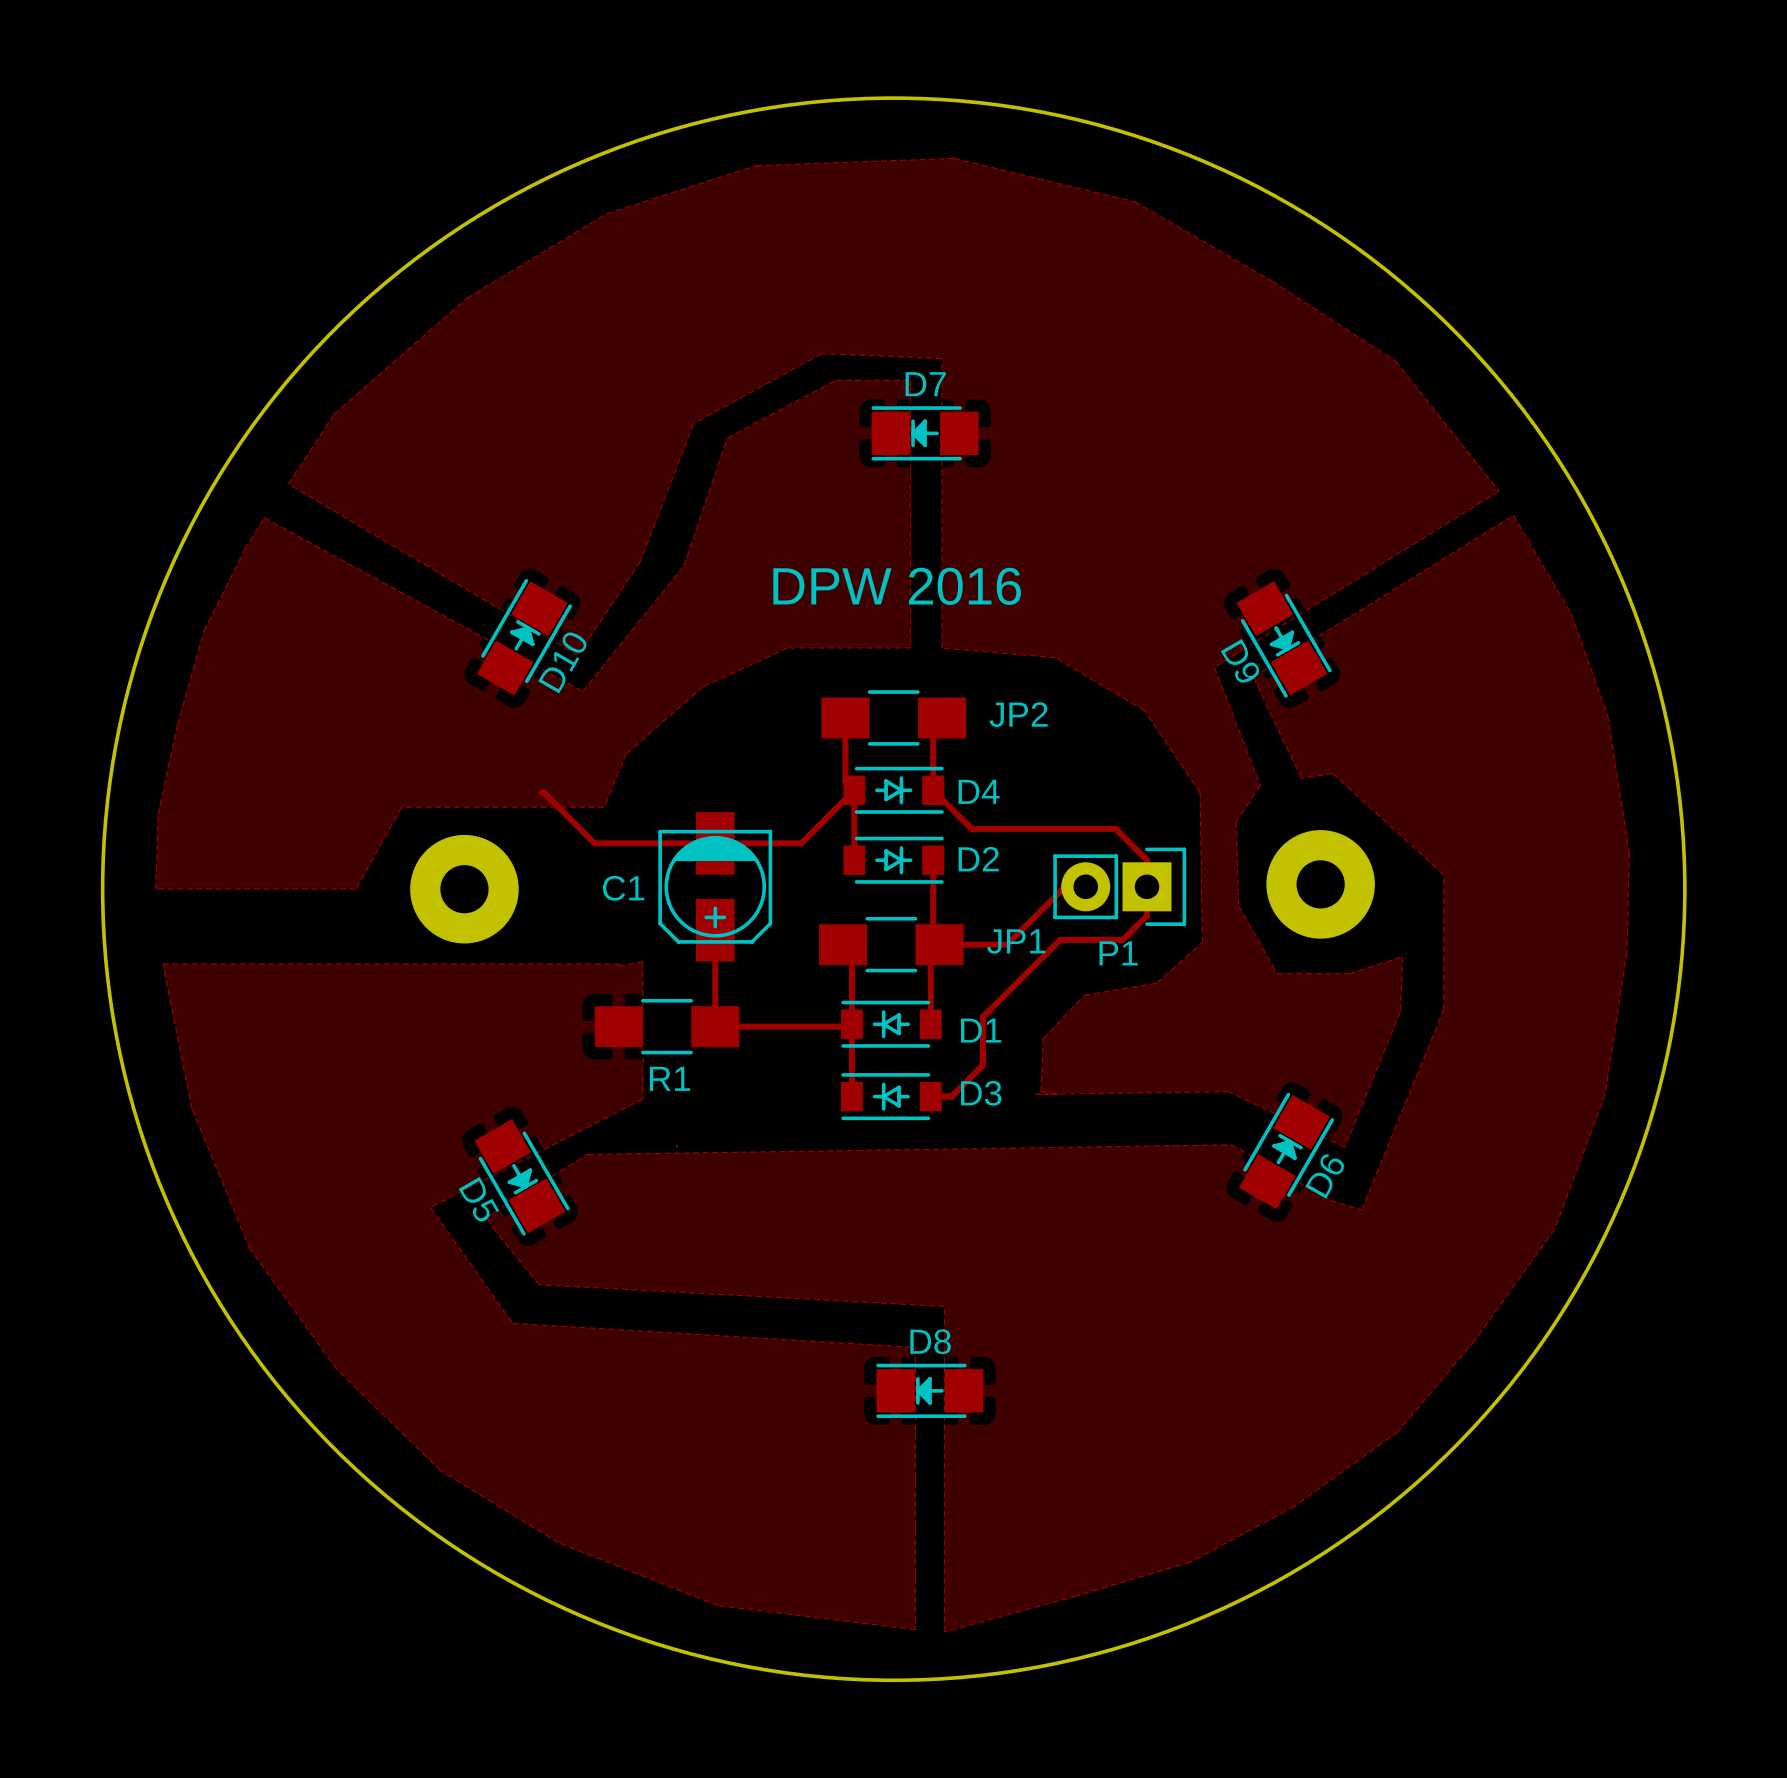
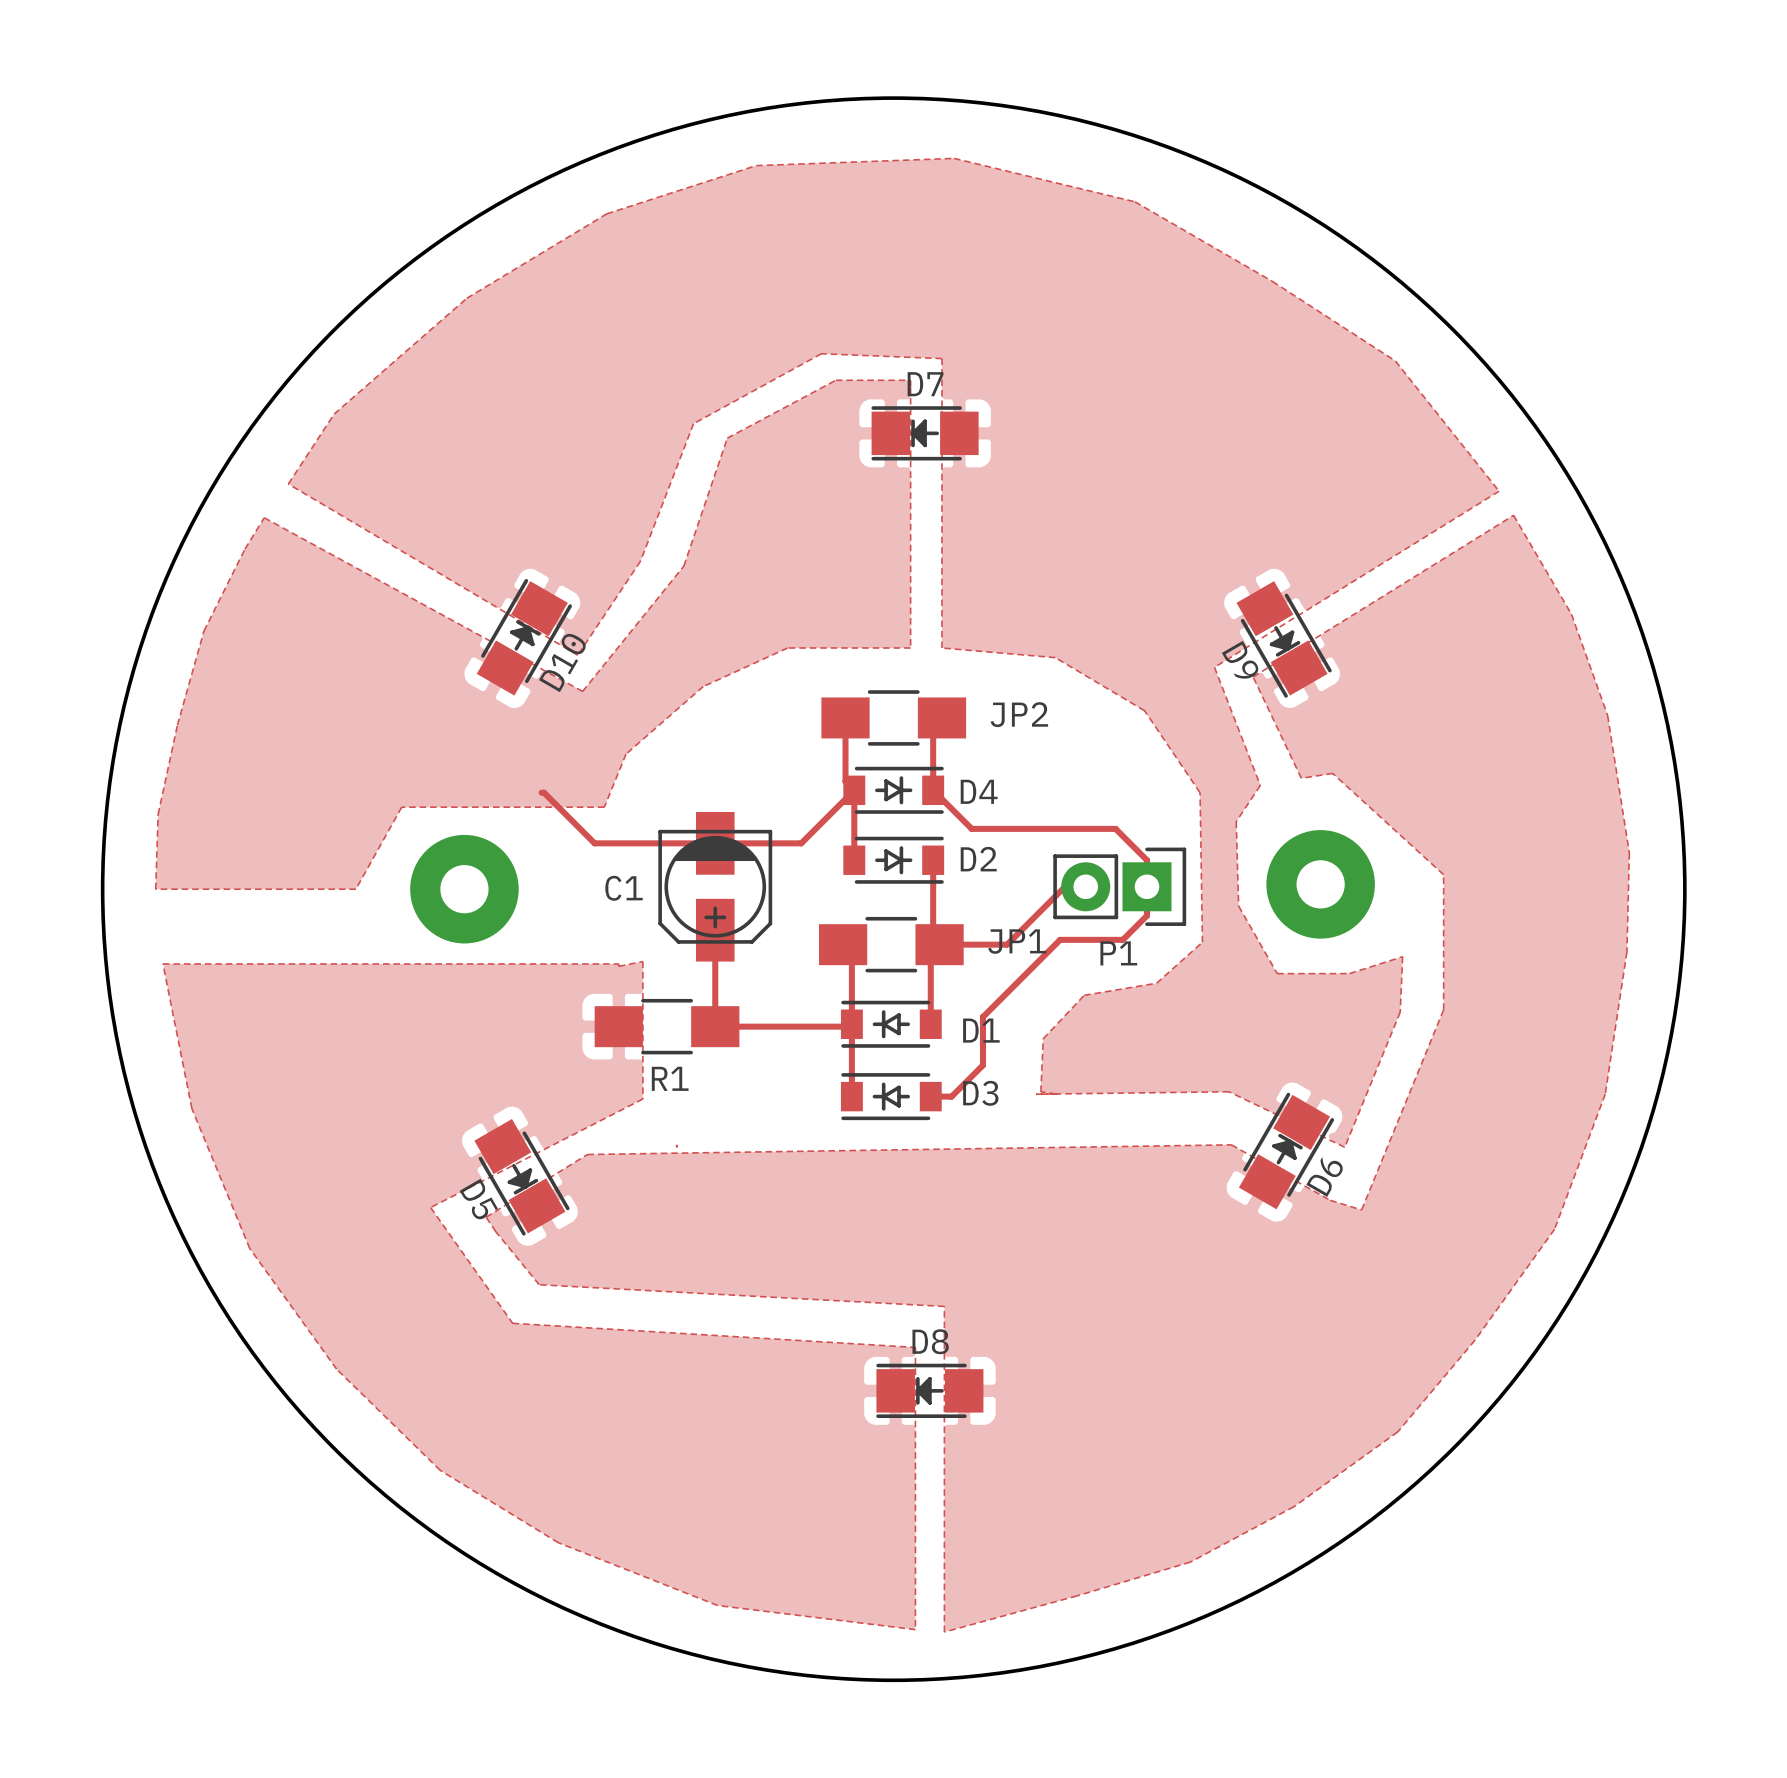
text: DPW 2016 (897, 586) -> none

